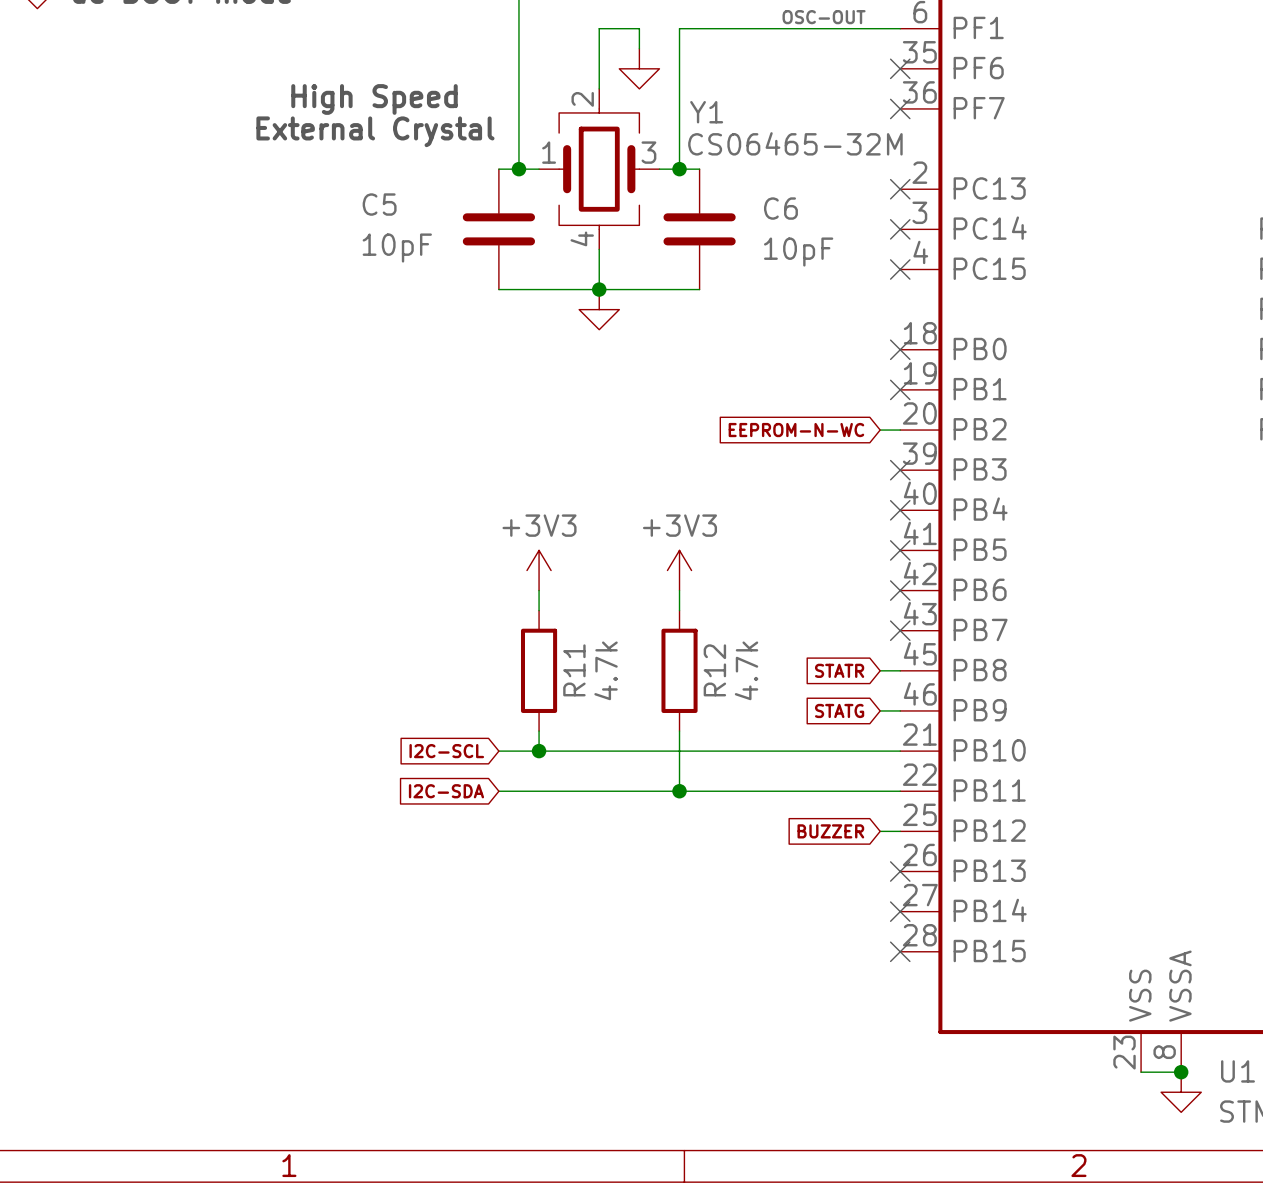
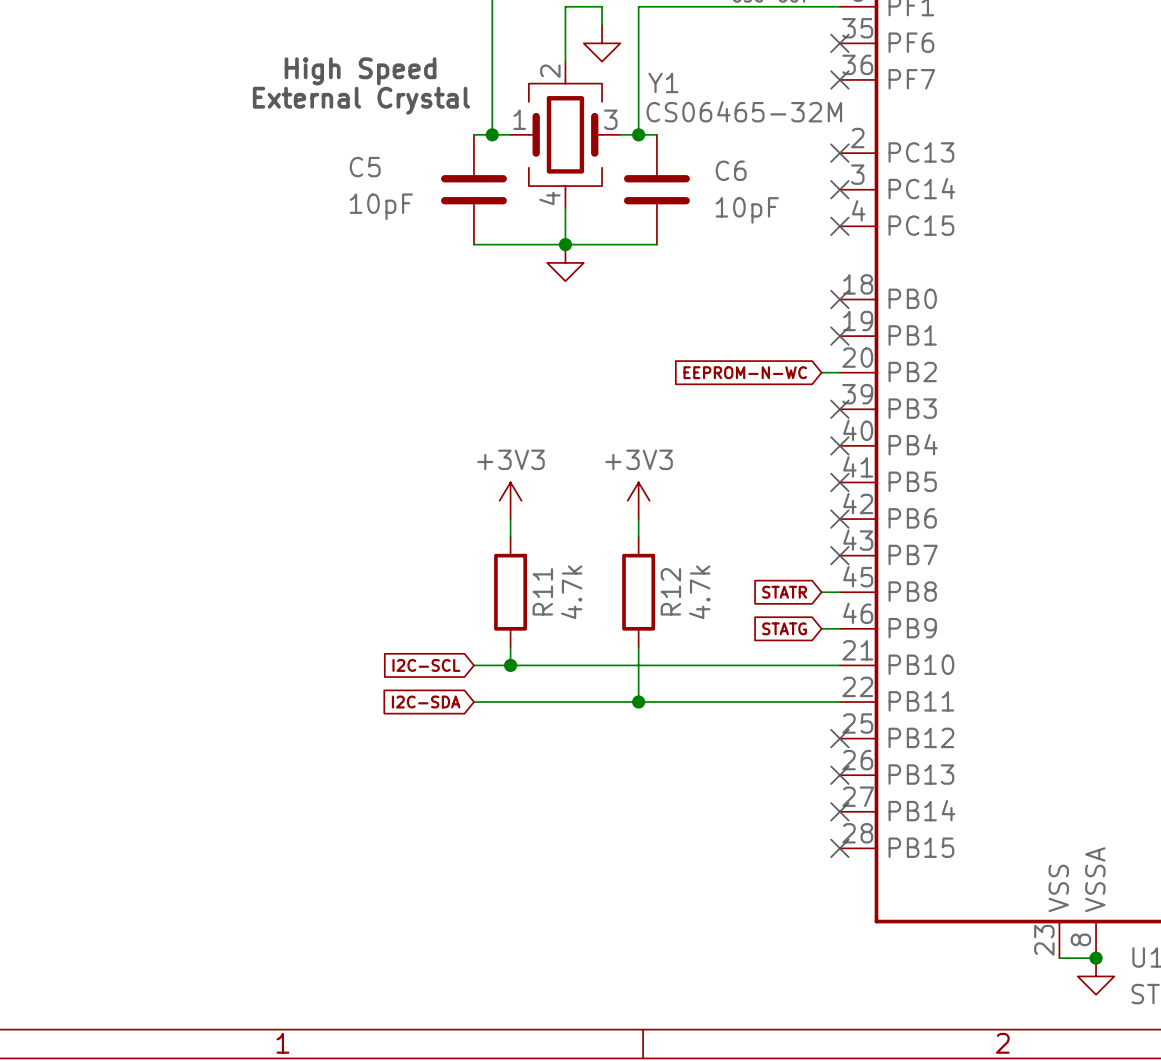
global label: BUZZER (830, 831) -> none
wire: (880, 831) (900, 831) -> none
no-connect mark: none -> (839, 738)

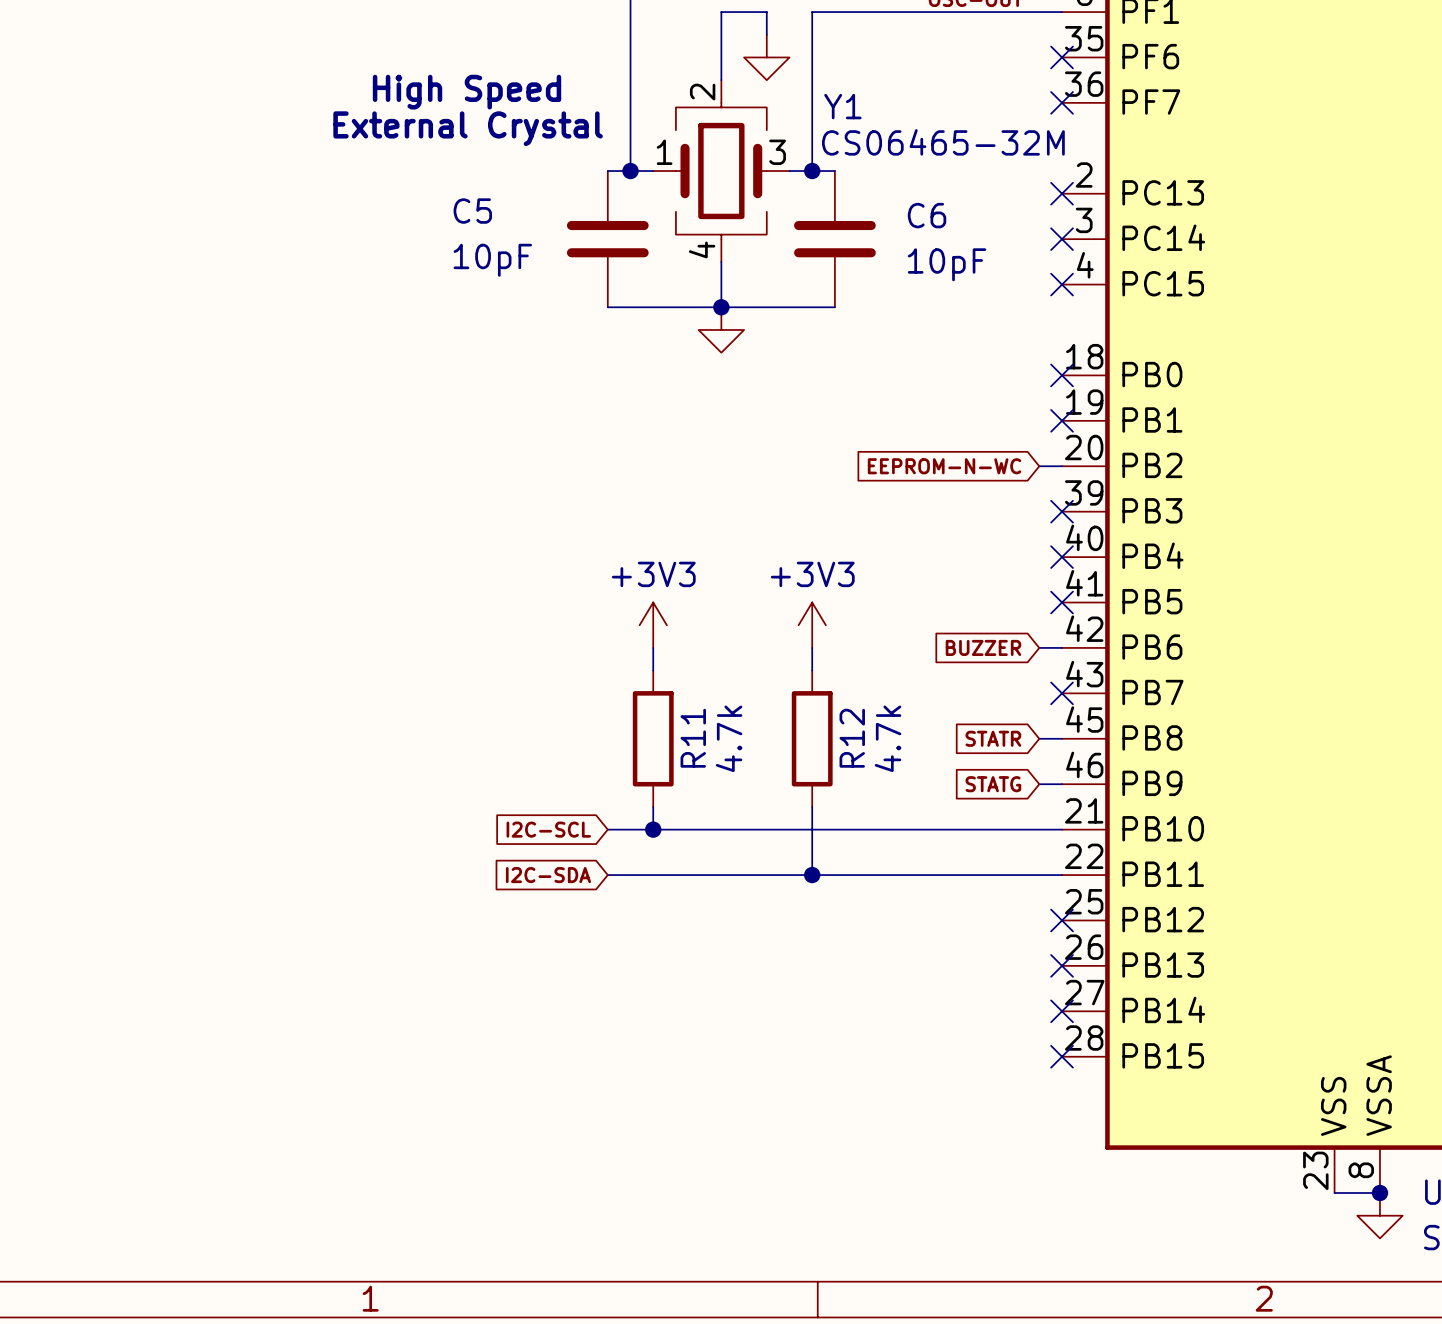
global label: none -> BUZZER (983, 647)
wire: none -> (1039, 647) (1062, 647)
no-connect mark: (839, 519) -> none

